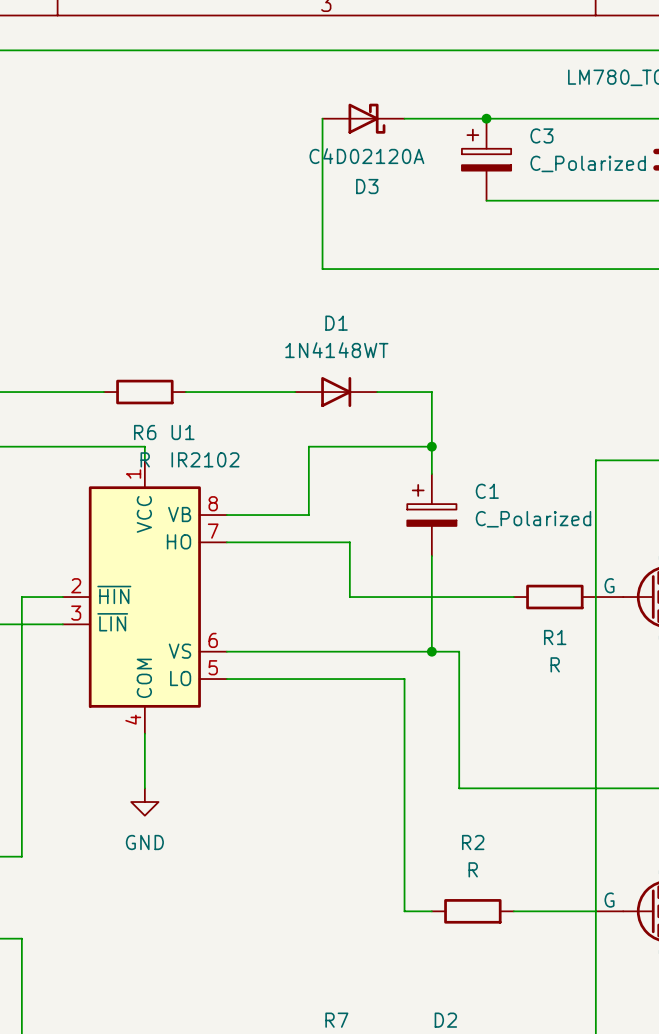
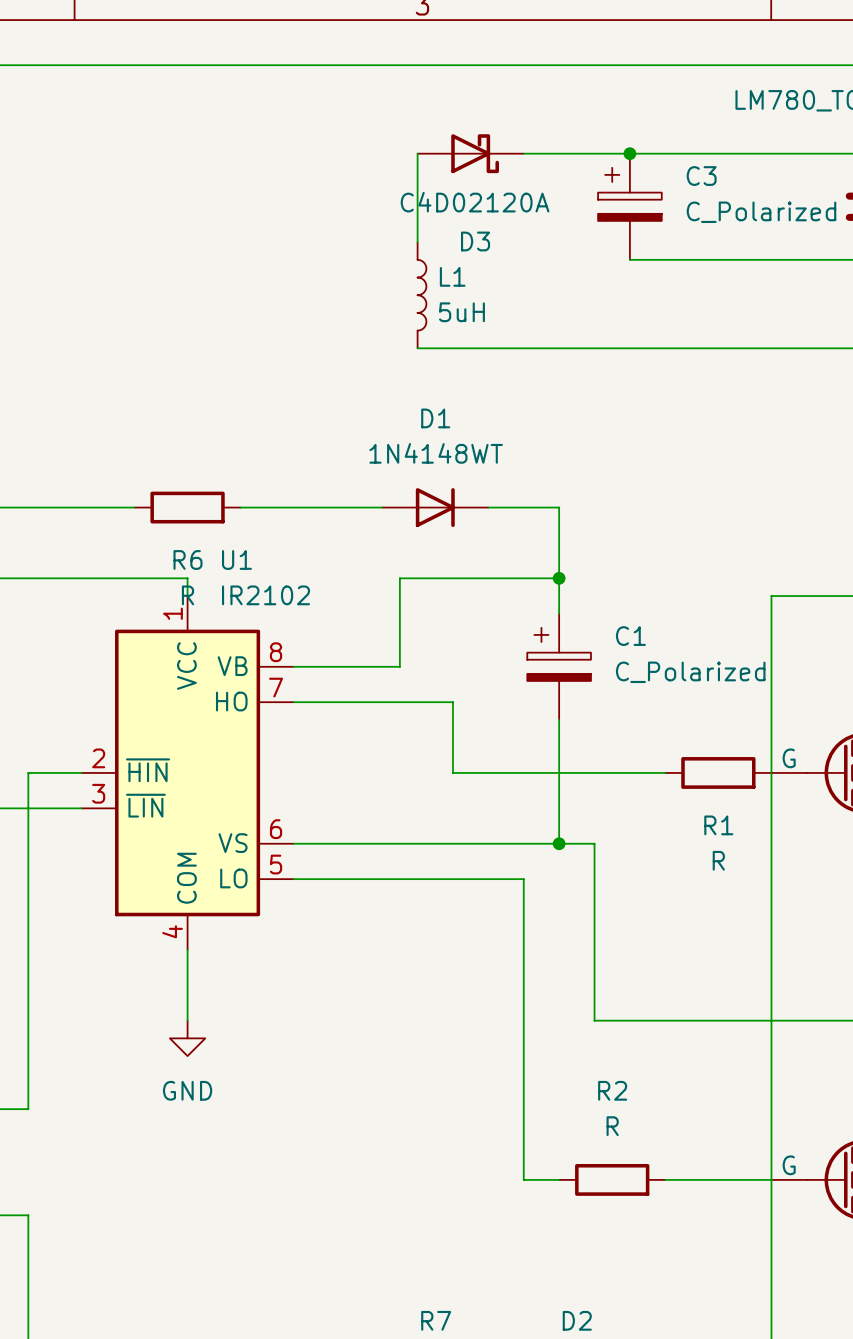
wire: (322, 187) (322, 269) -> none
L1: none -> 5uH (422, 295)

